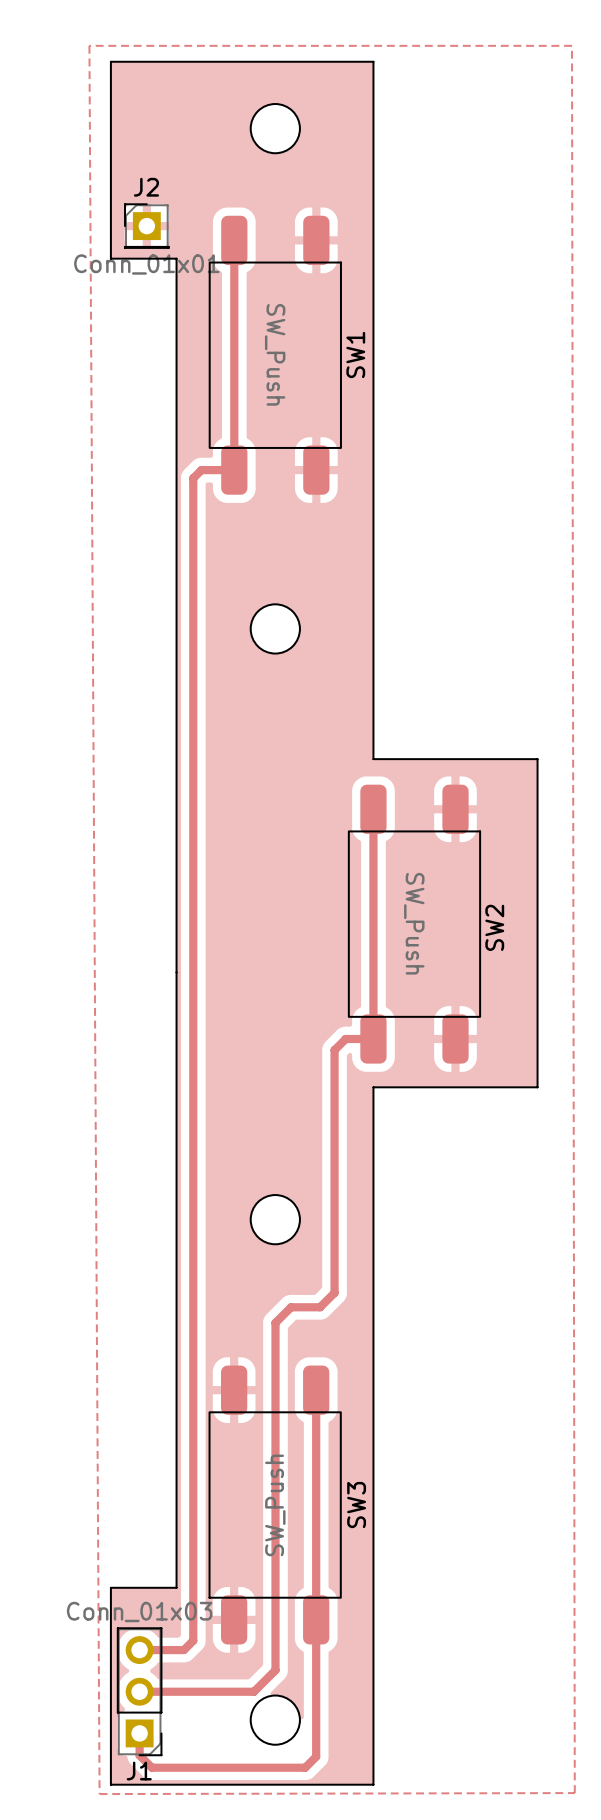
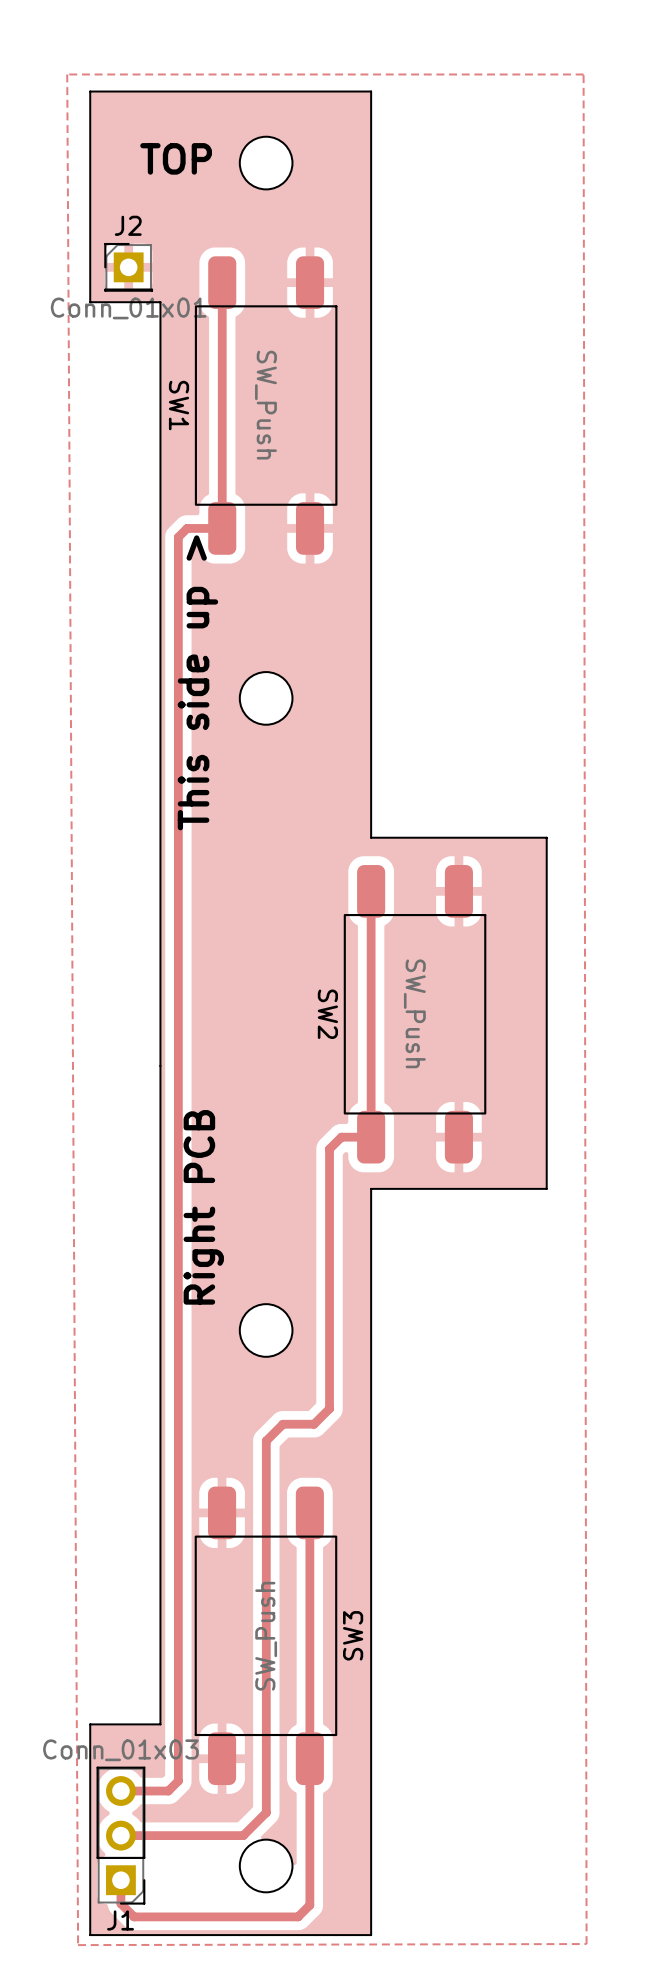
text: none -> TOP (176, 158)
SW1 name rotation: 0° (355, 354) -> 180° (179, 405)
SW1 name position: SW1 (355, 354) -> SW1 (179, 405)
text: none -> This side up > (197, 682)
SW2 name rotation: 0° (494, 927) -> 180° (327, 1014)
SW2 name position: SW2 (494, 927) -> SW2 (327, 1014)
text: none -> Right PCB (203, 1207)

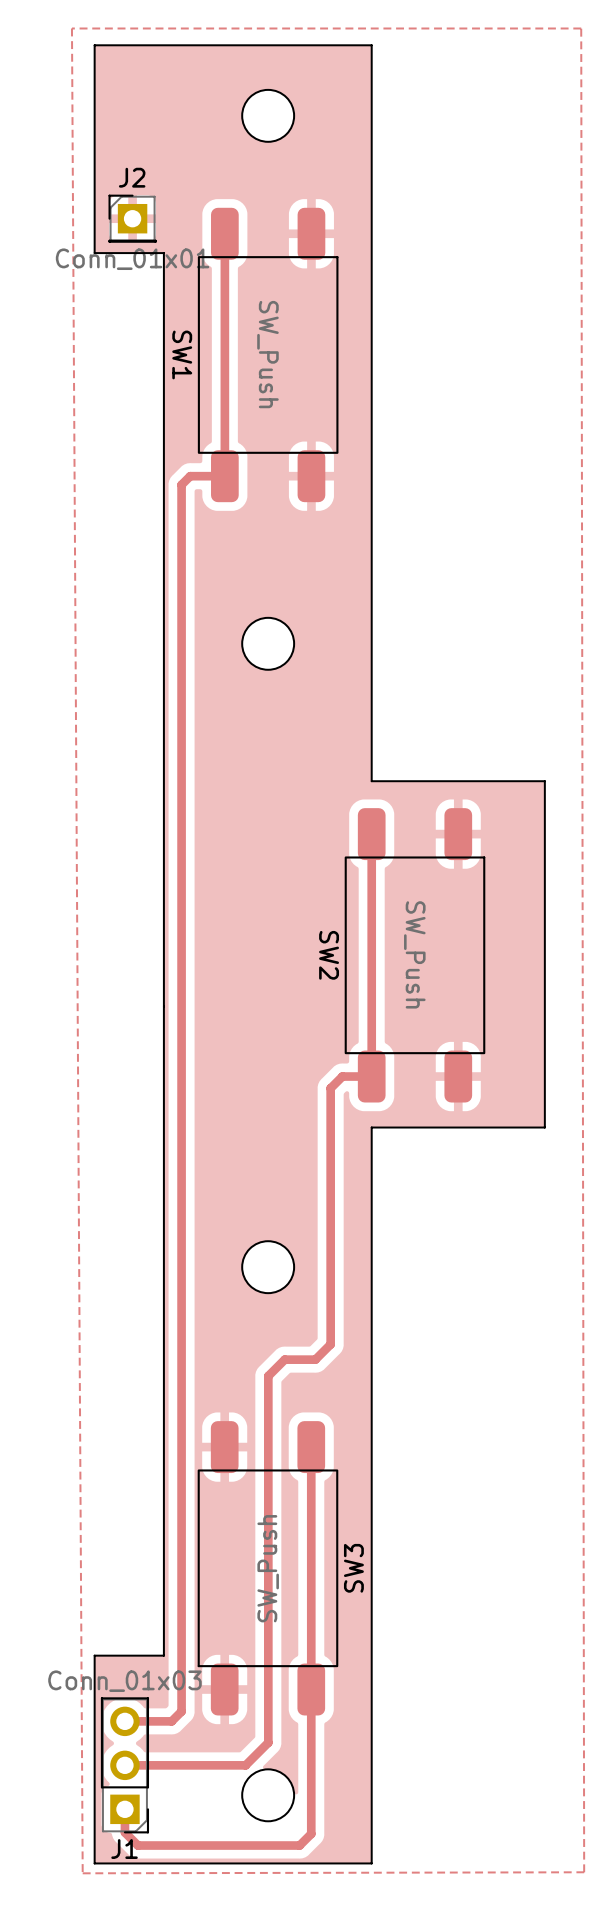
text: TOP (176, 158) -> none
text: This side up > (197, 682) -> none
text: Right PCB (203, 1207) -> none

